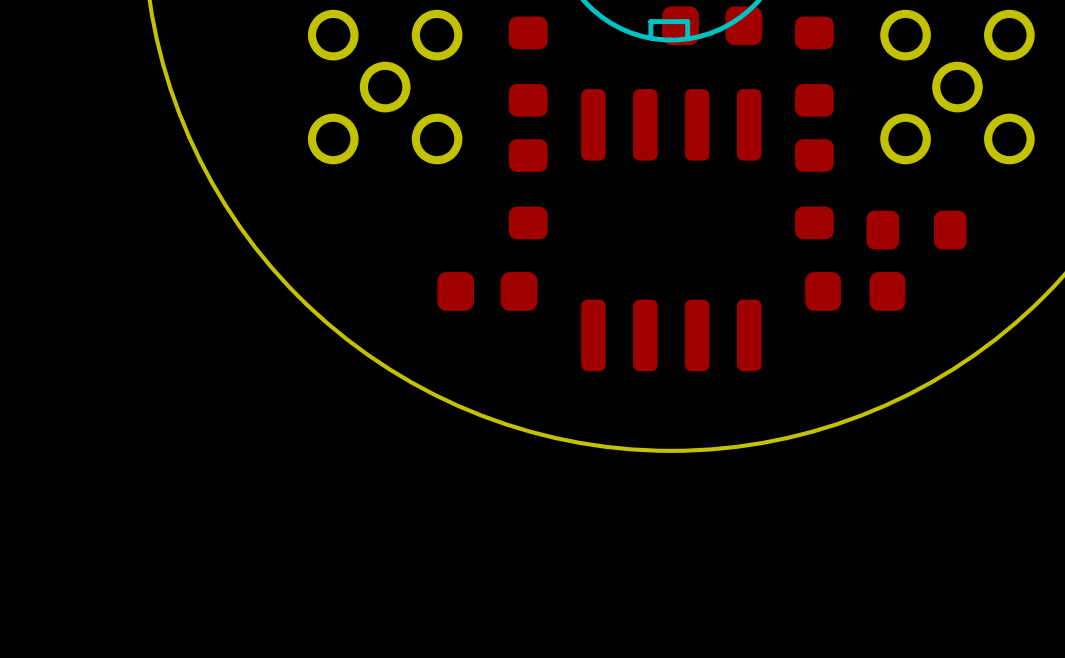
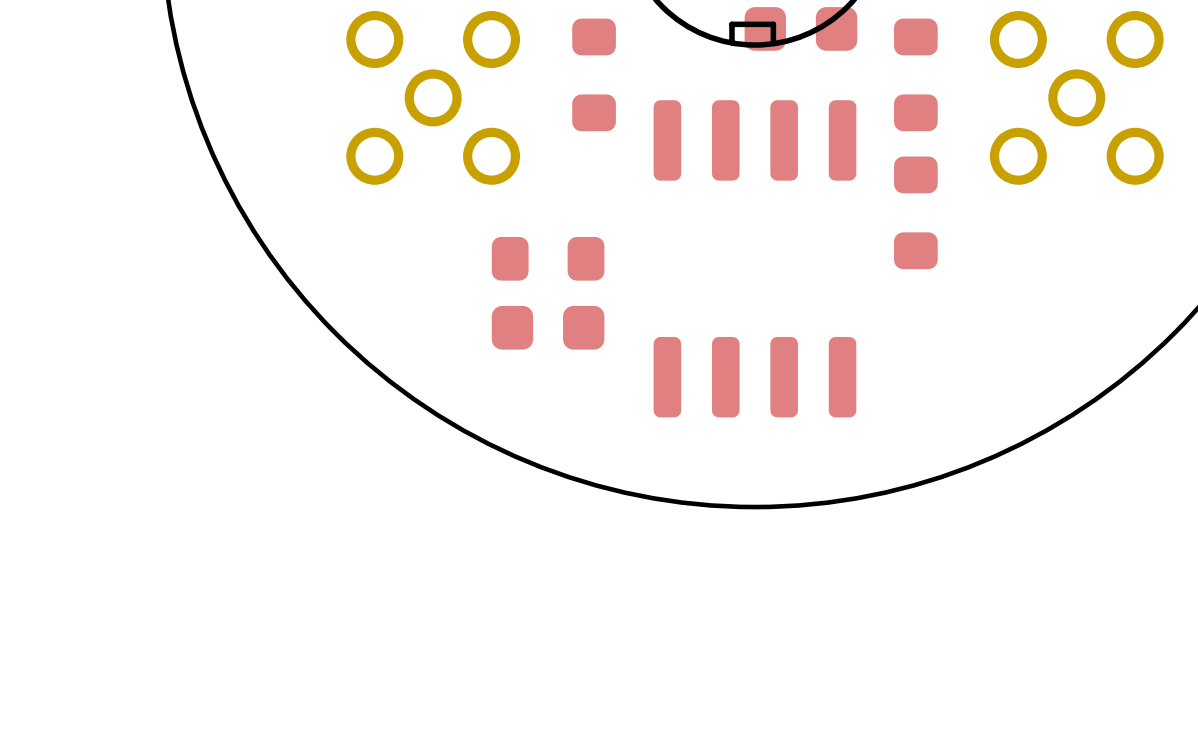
part rotation: 0° (528, 189) -> 90° clockwise (548, 258)
part: (916, 230) -> none
part: (855, 291) -> none

